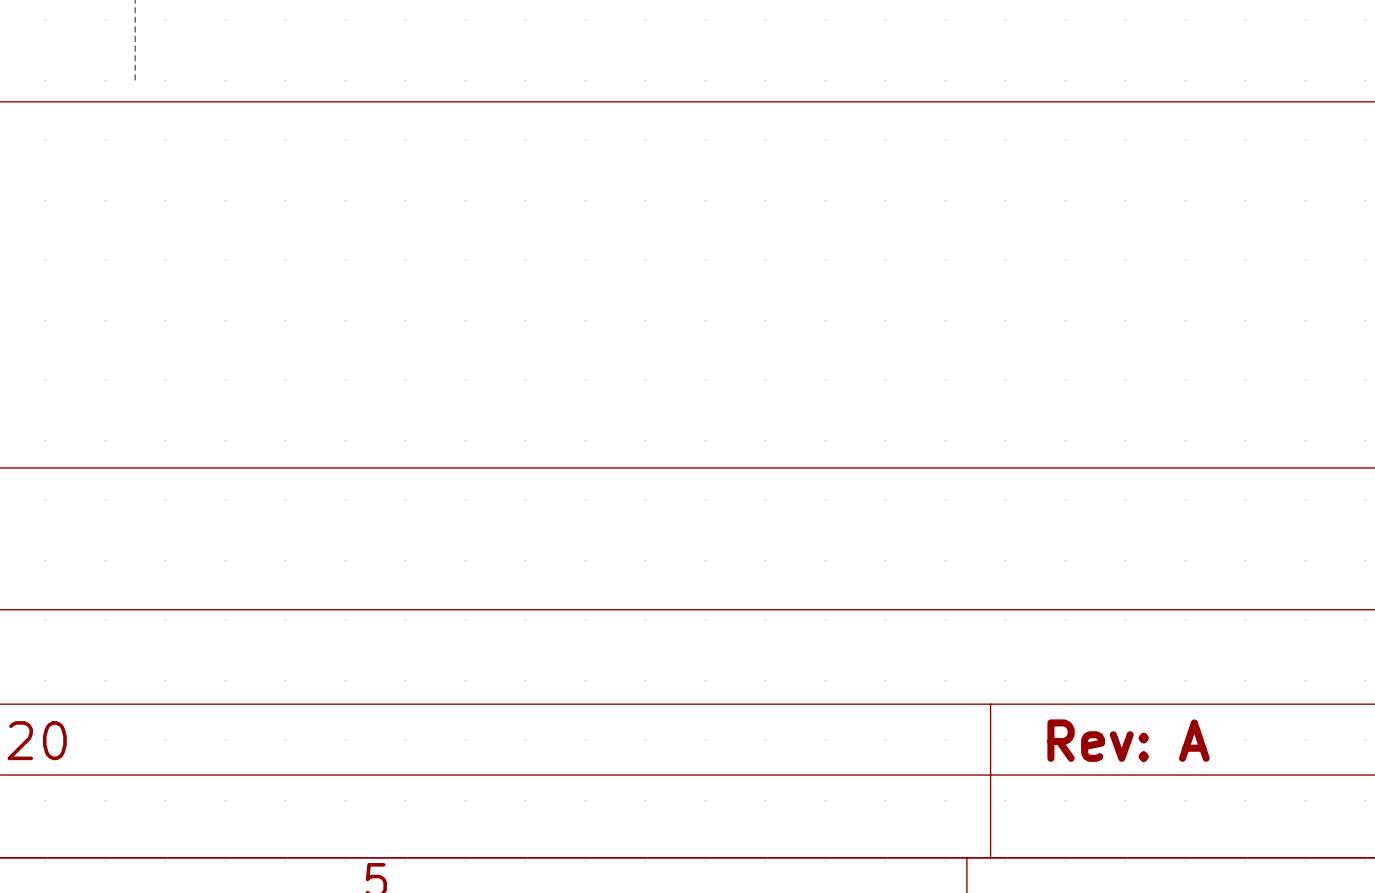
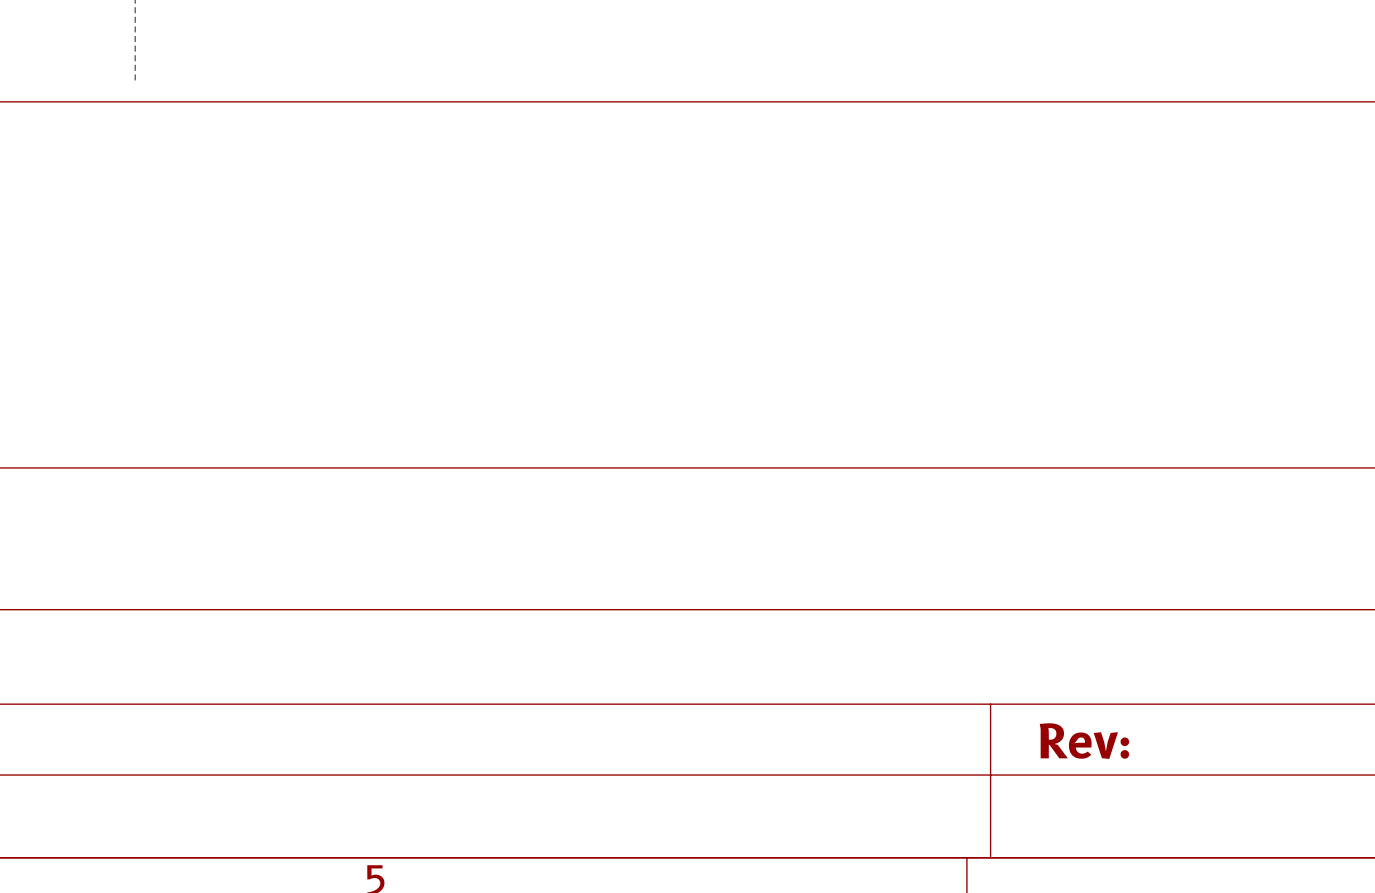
title block: Rev: A (1128, 740) -> Rev: (1084, 741)

